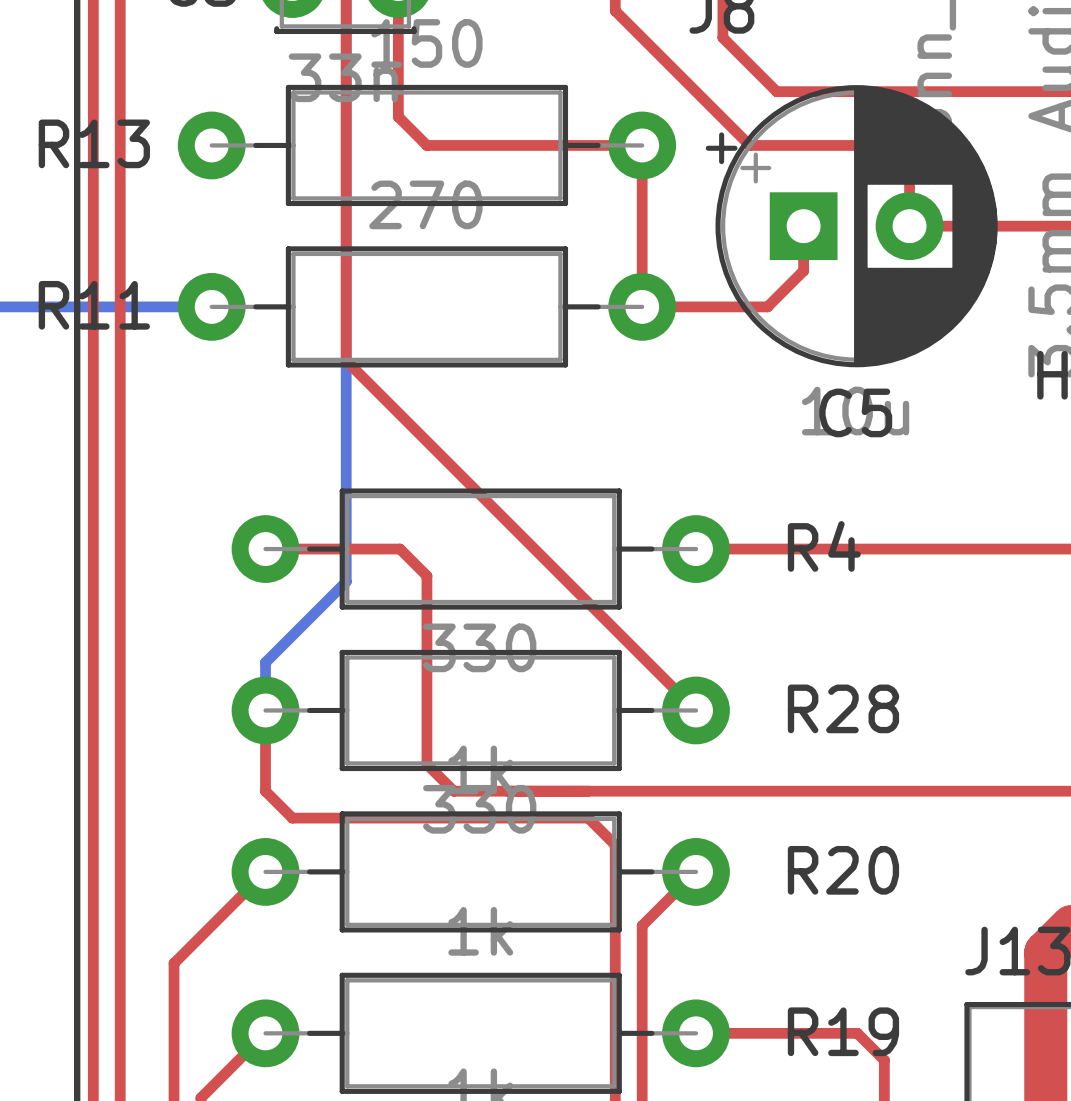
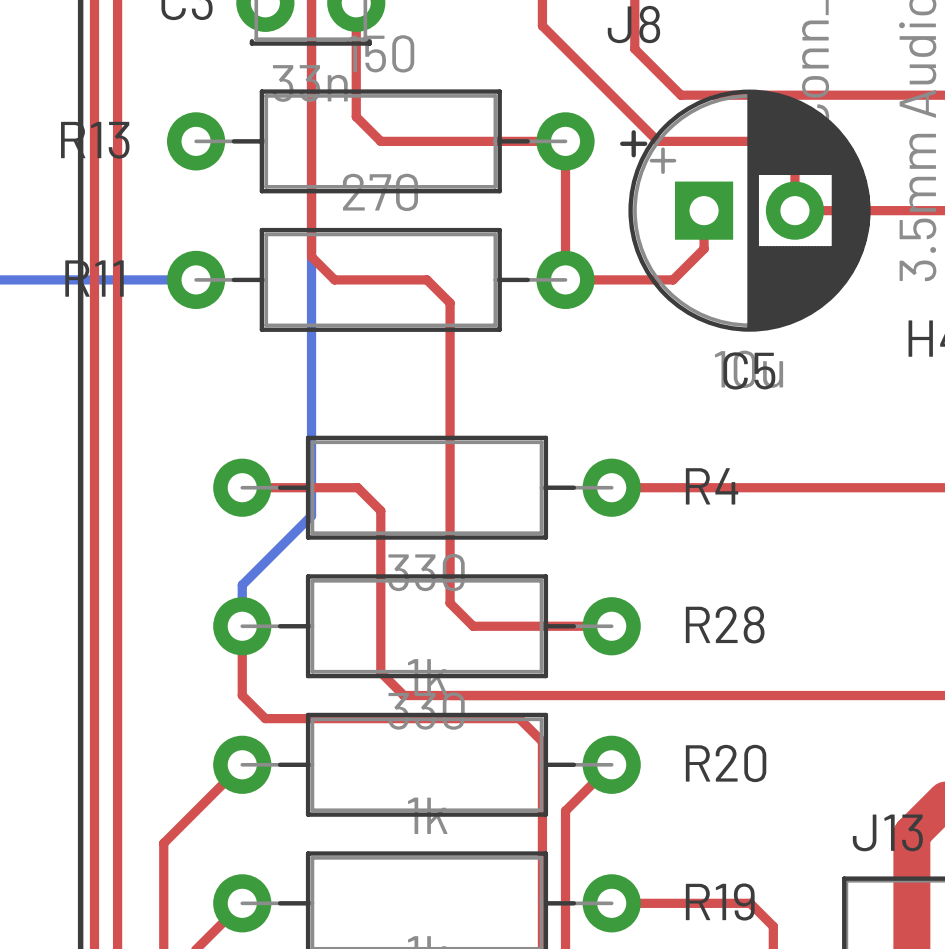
top track: (346, 279) (346, 360) (696, 710) -> (311, 256) (334, 279) (426, 279) (450, 303) (450, 603) (473, 626) (611, 626)

